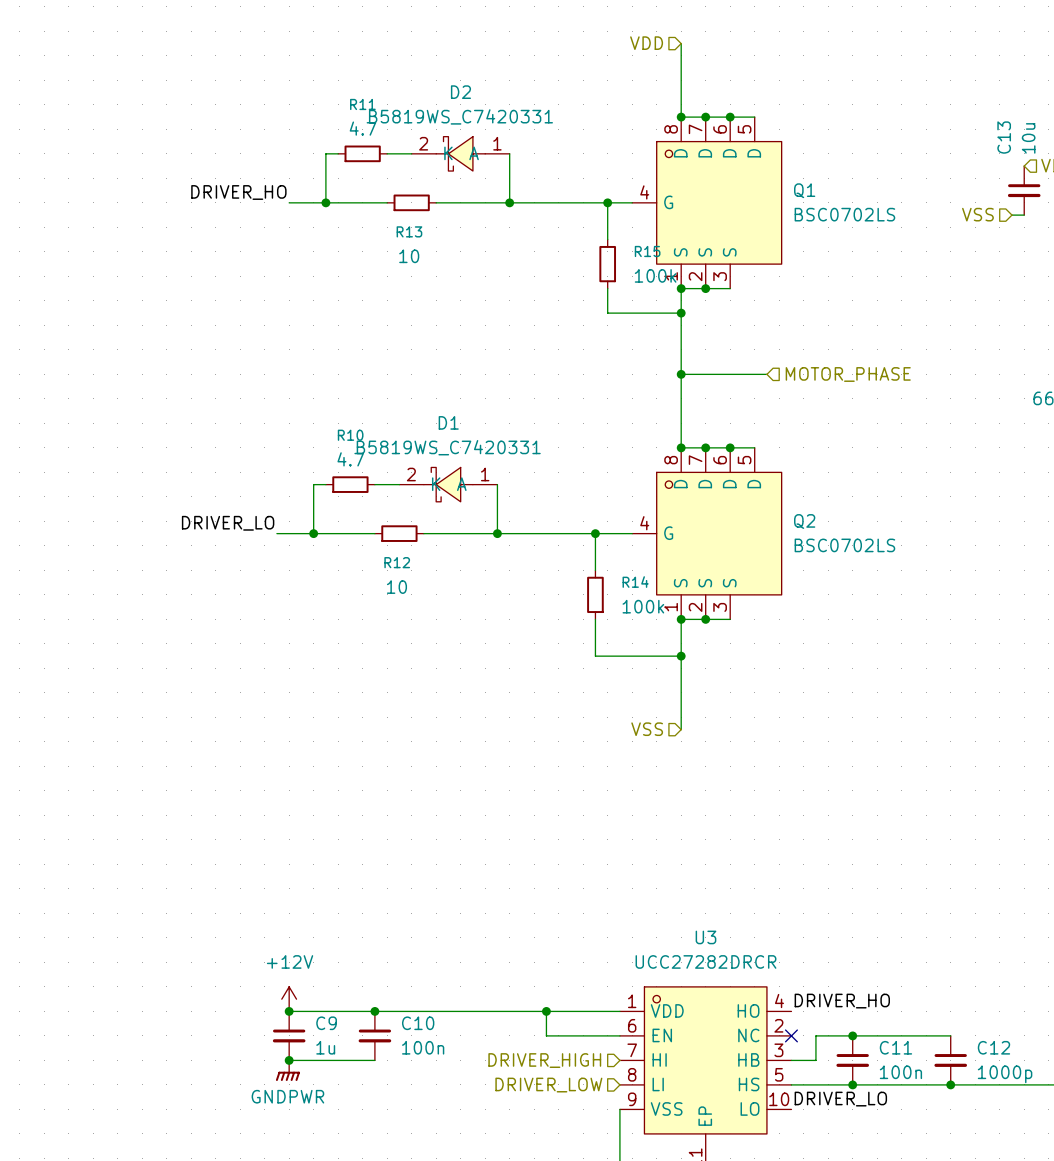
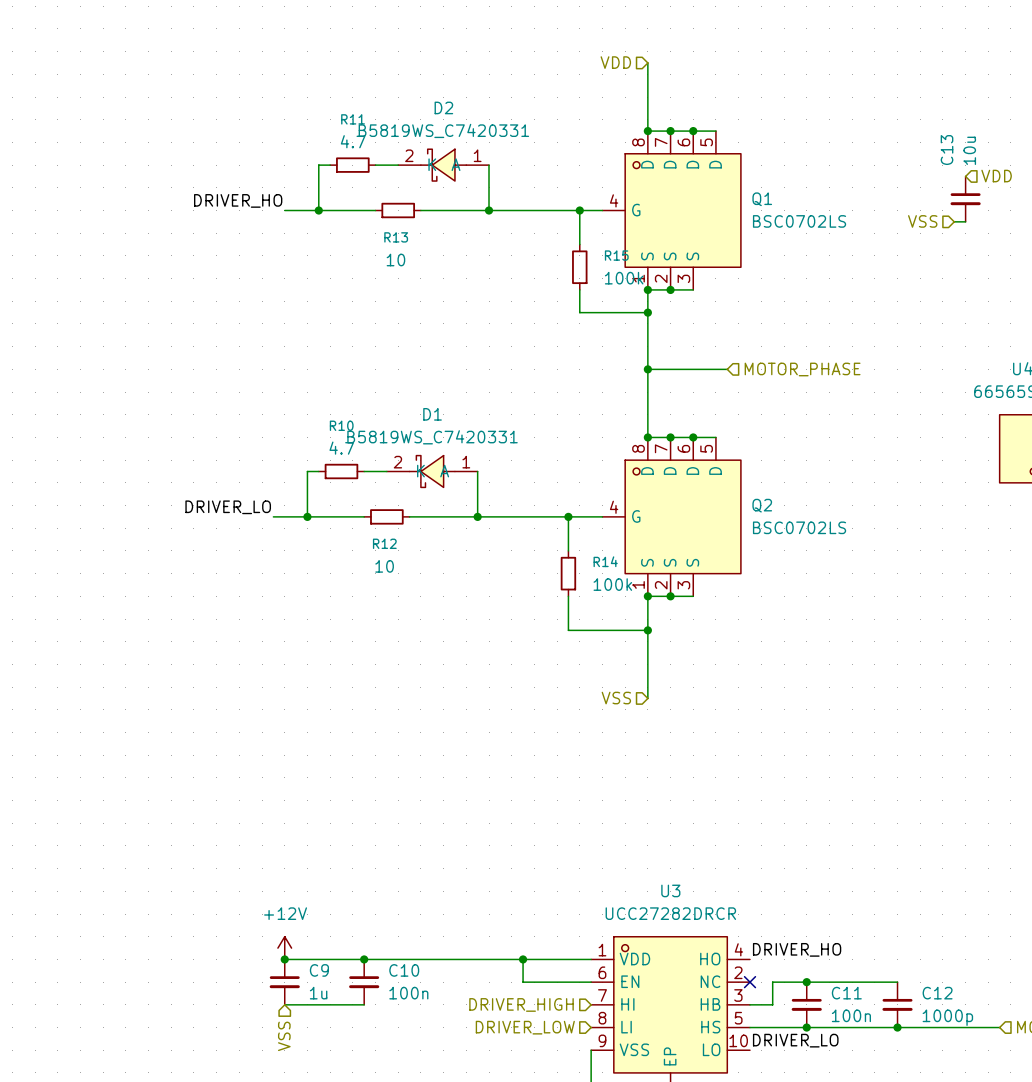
junction: (289, 1060) -> none
power symbol: GNDPWR (287, 1070) -> none
hierarchical label: none -> VSS (284, 1036)

